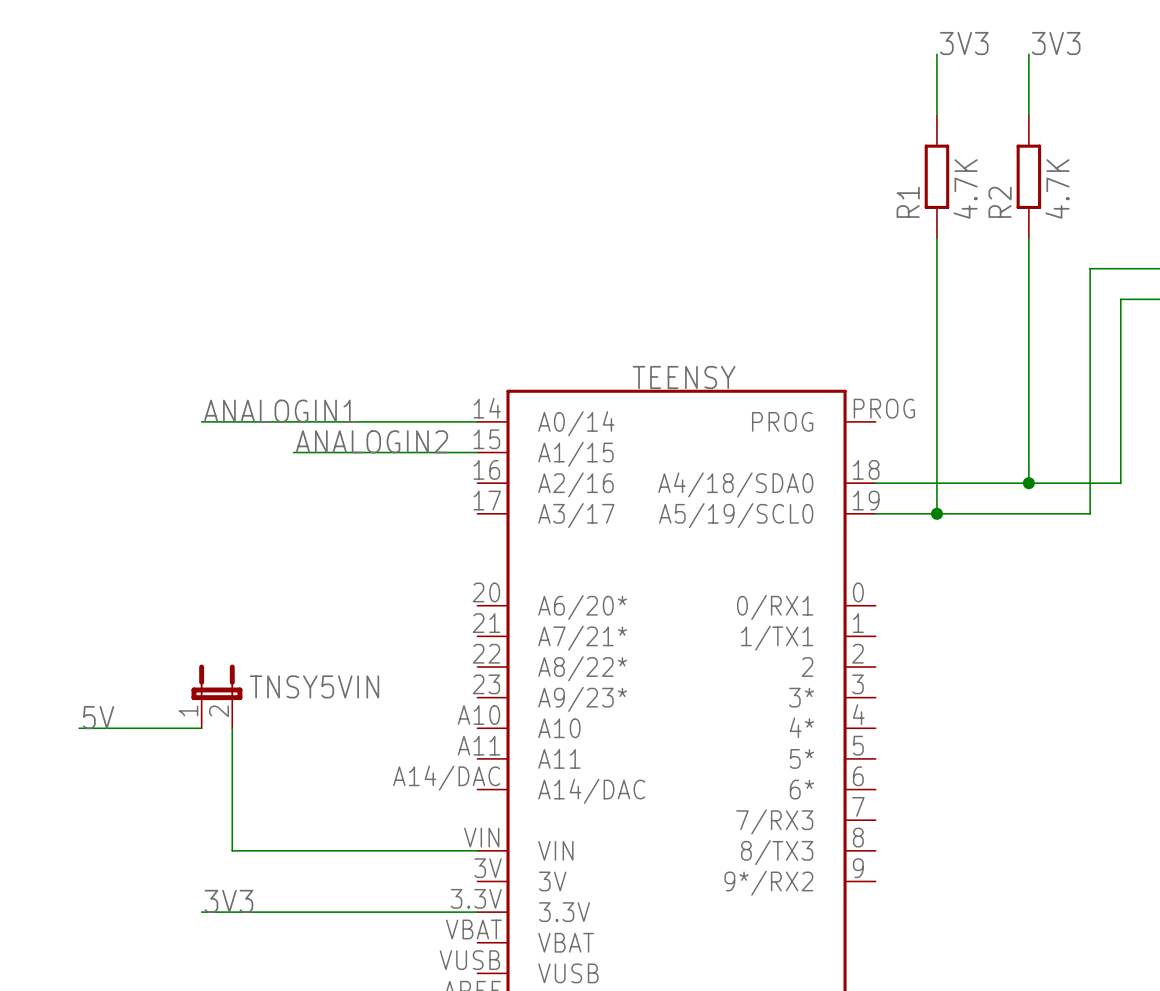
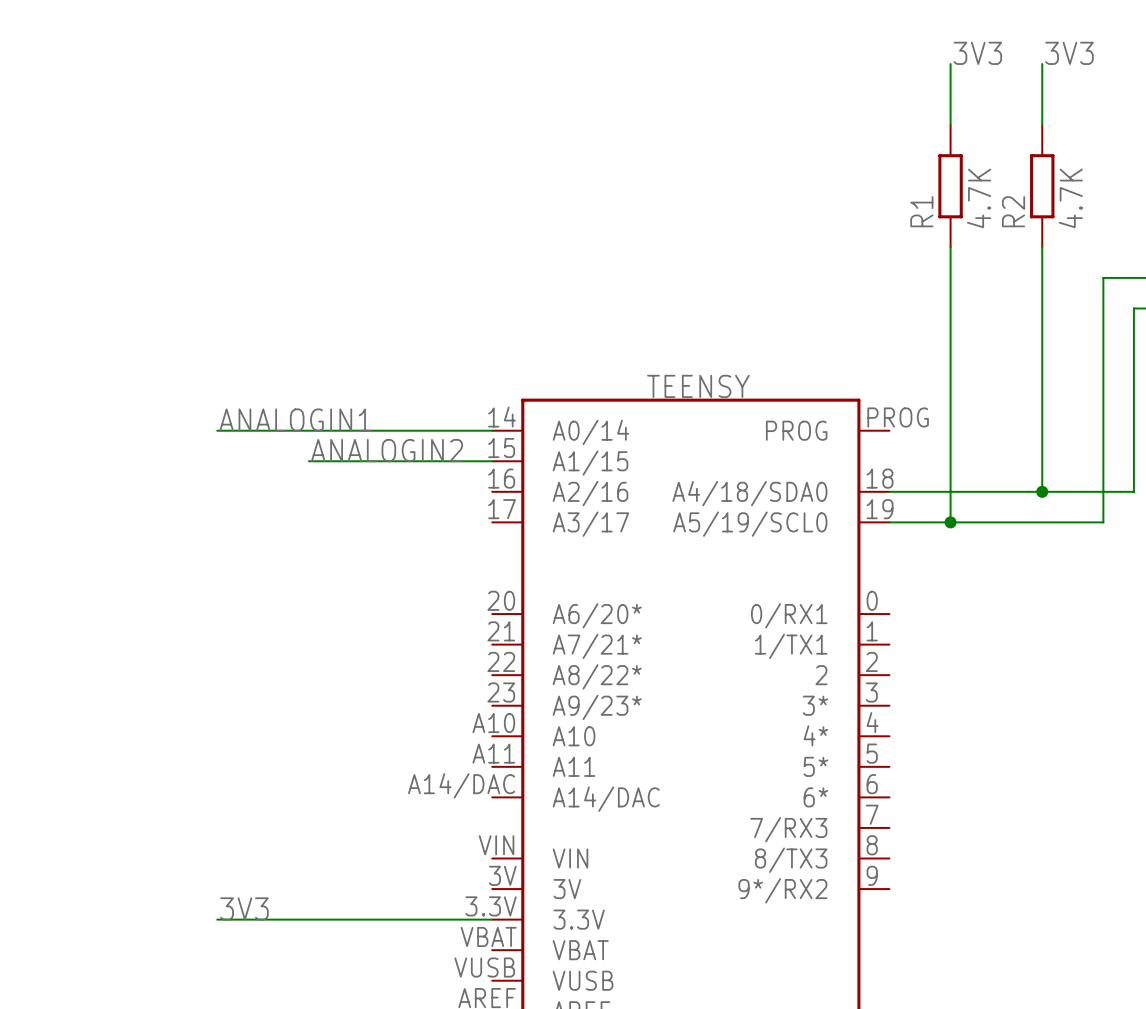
TNSY5VIN: (216, 696) -> none
label: 5V (98, 717) -> none
wire: (79, 728) (201, 728) -> none
wire: (232, 728) (232, 850) (477, 850) -> none

